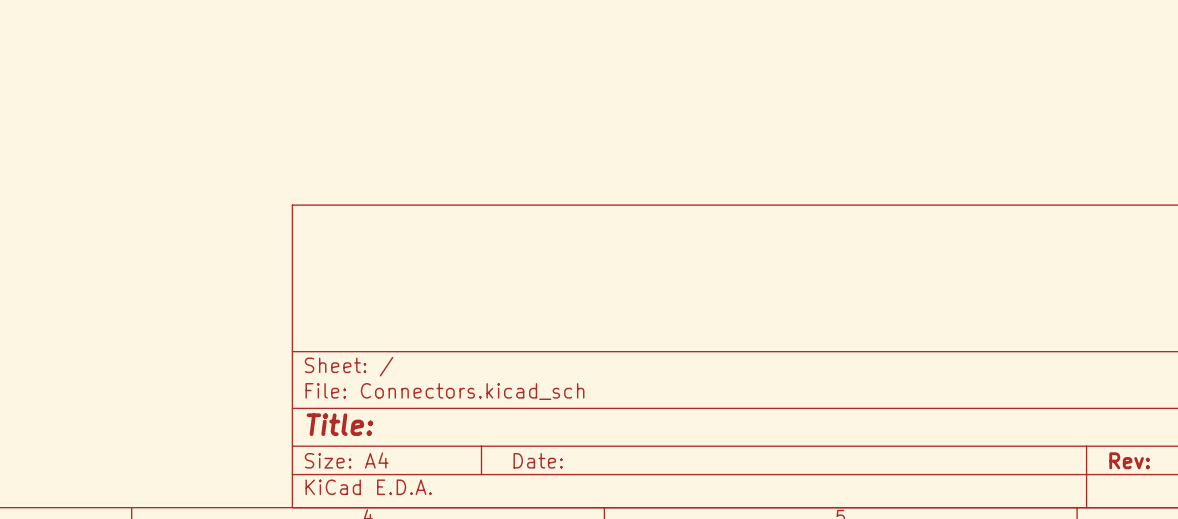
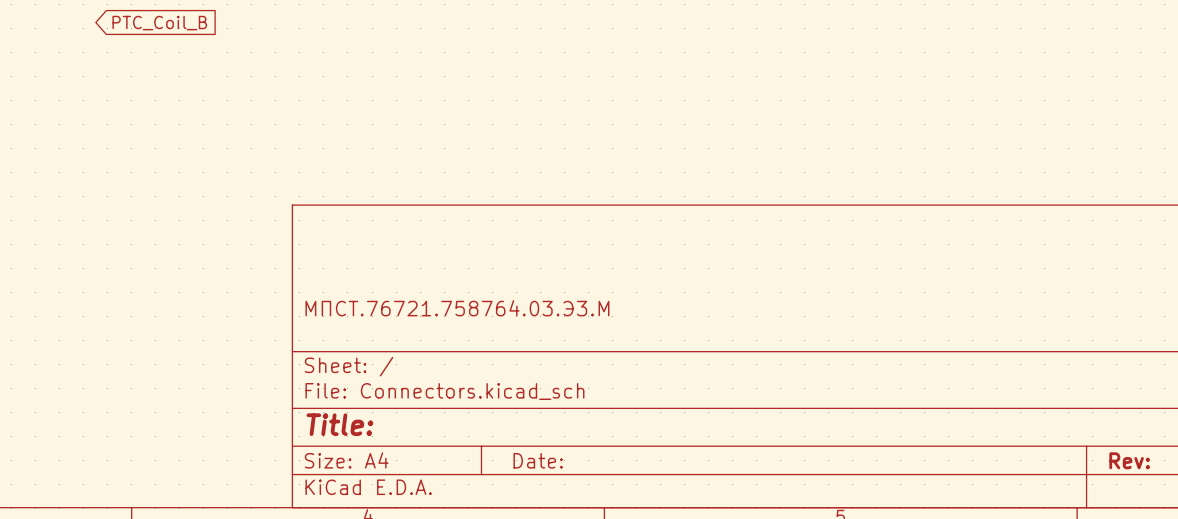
global label: none -> PTC_Coil_B (159, 23)
title block: none -> МПСТ.76721.758764.03.Э3.М (457, 308)

